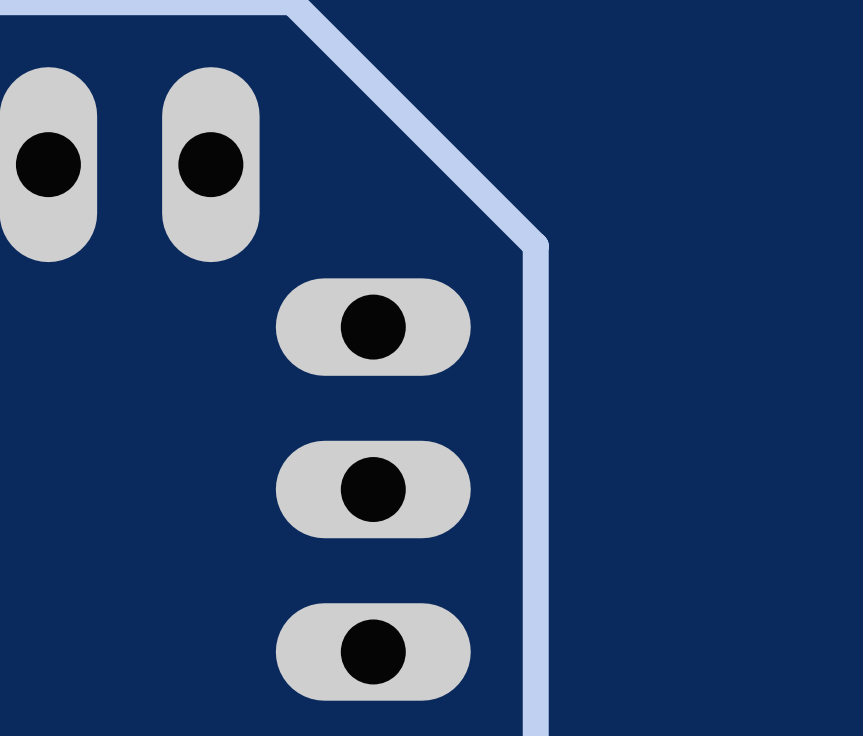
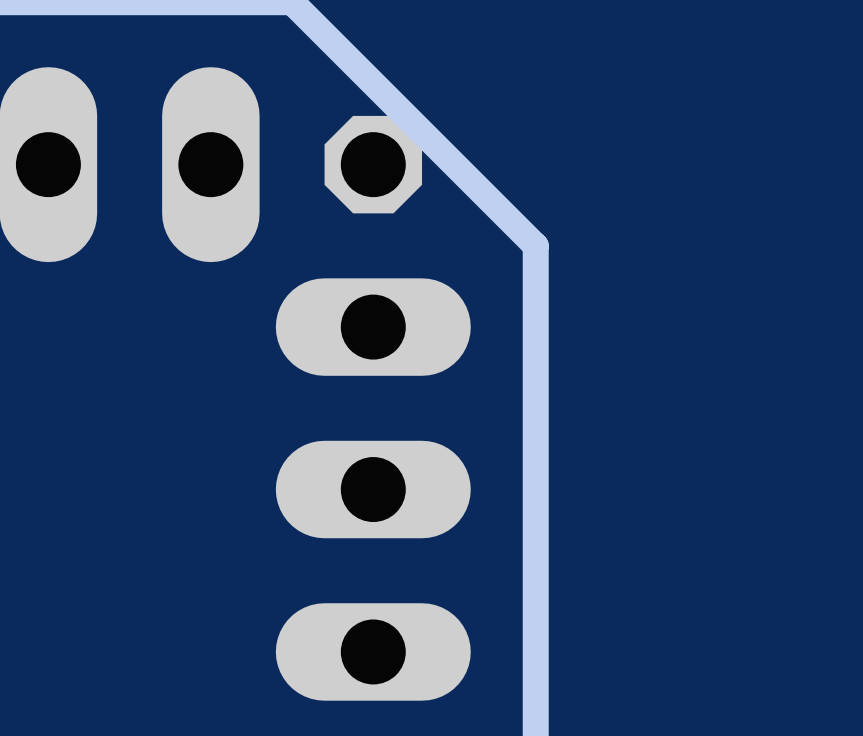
part: none -> (373, 164)

